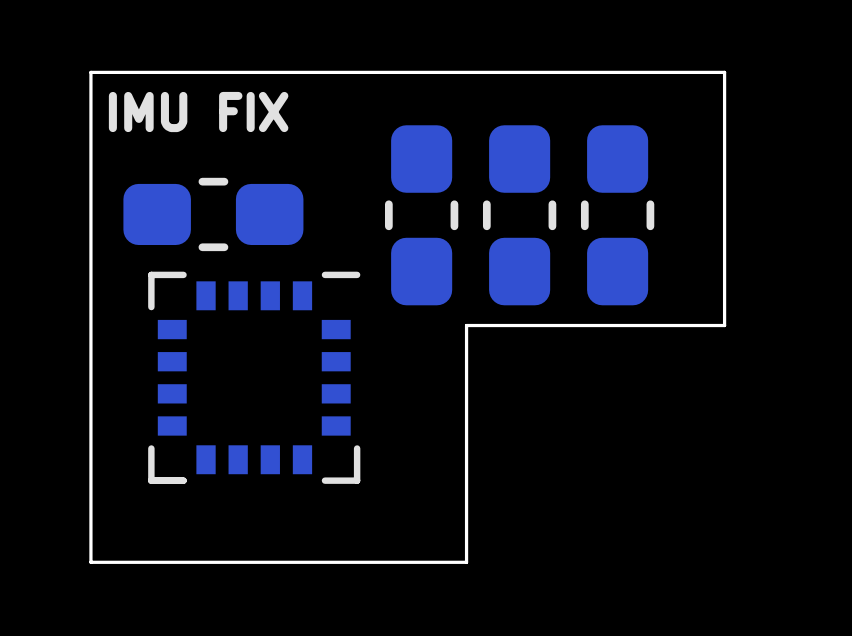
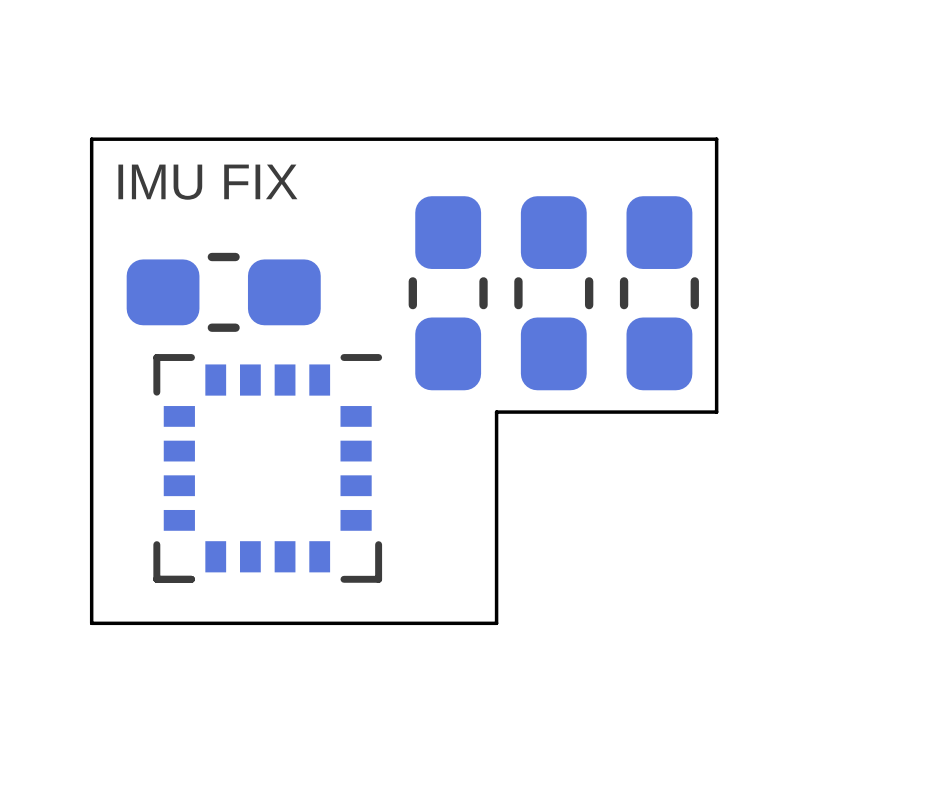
board edge: (670, 72) (724, 72) (724, 325) (670, 325) -> (716, 139) (716, 412)
board edge: (466, 521) (466, 562) (90, 562) (90, 521) -> (496, 623) (91, 623)

